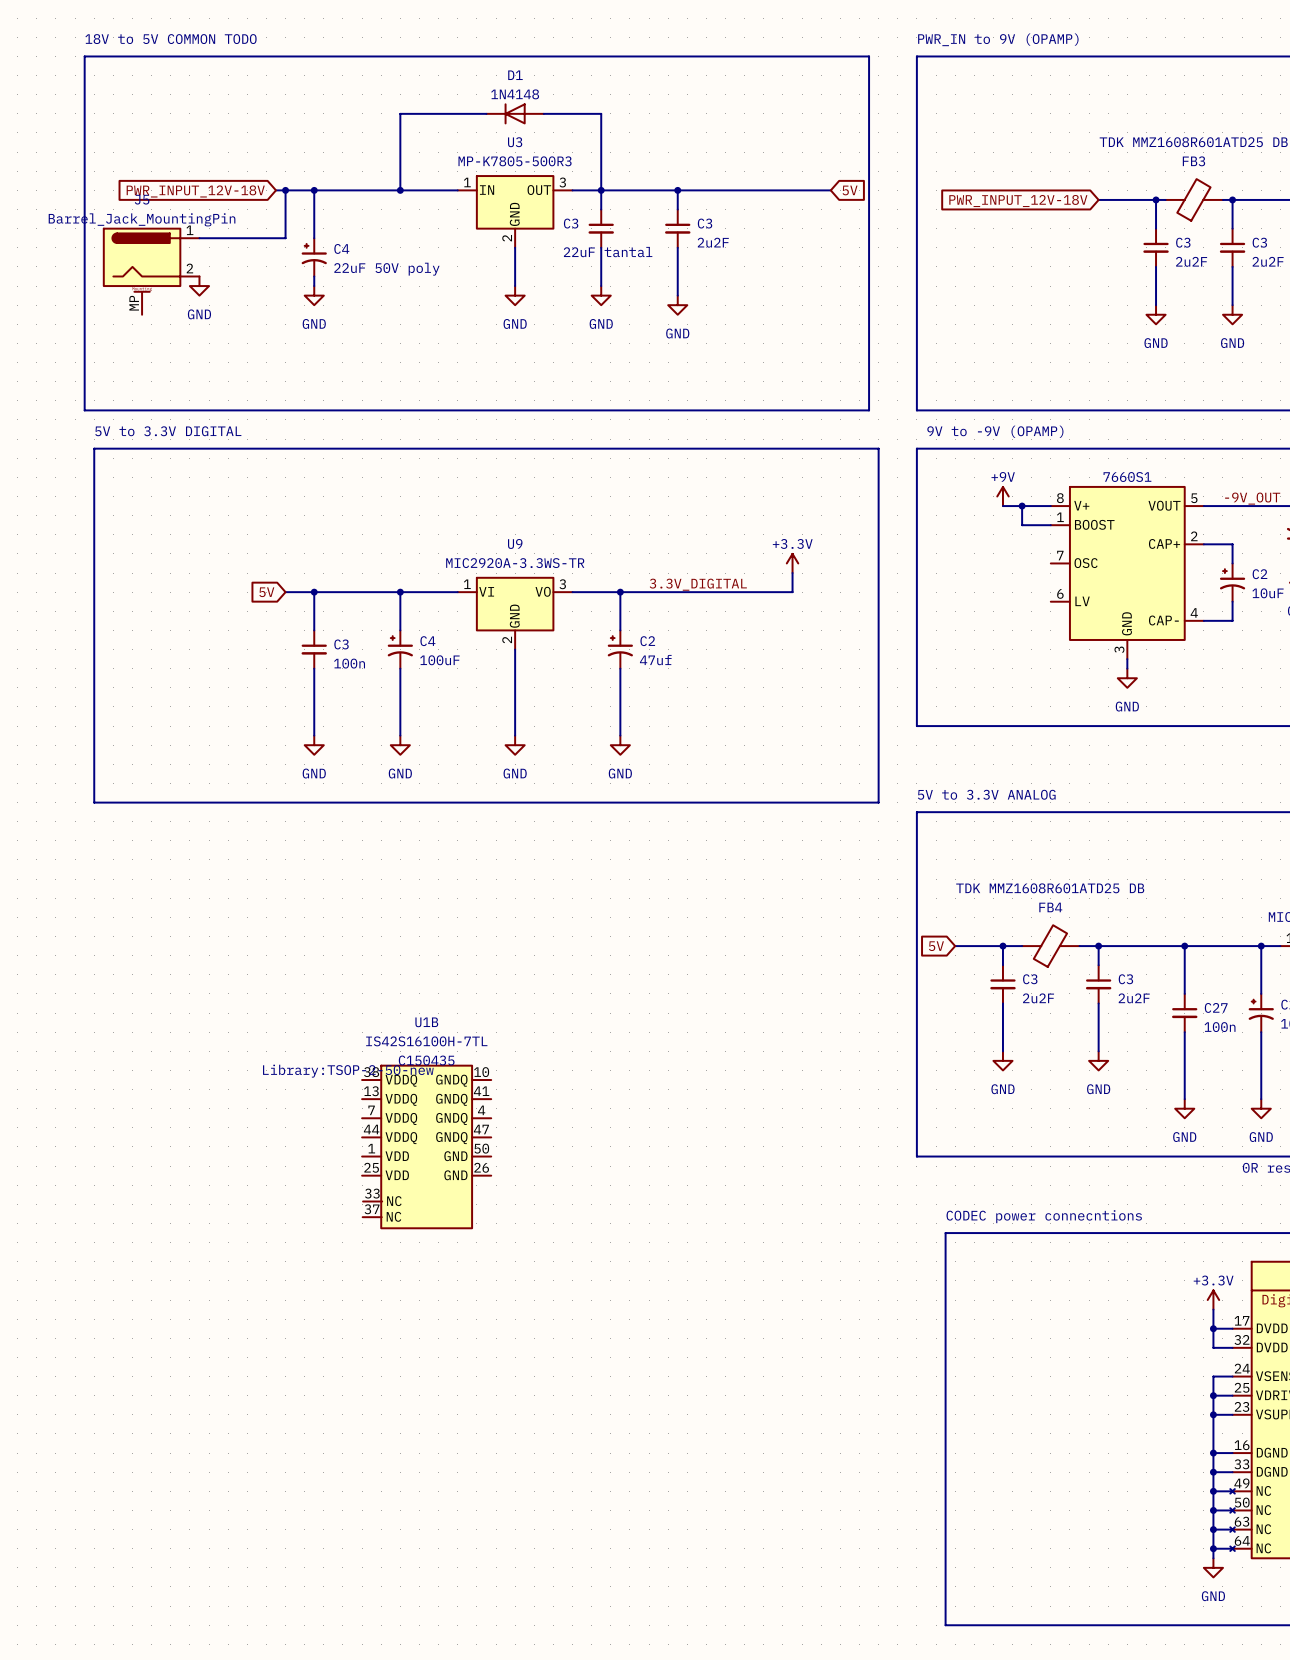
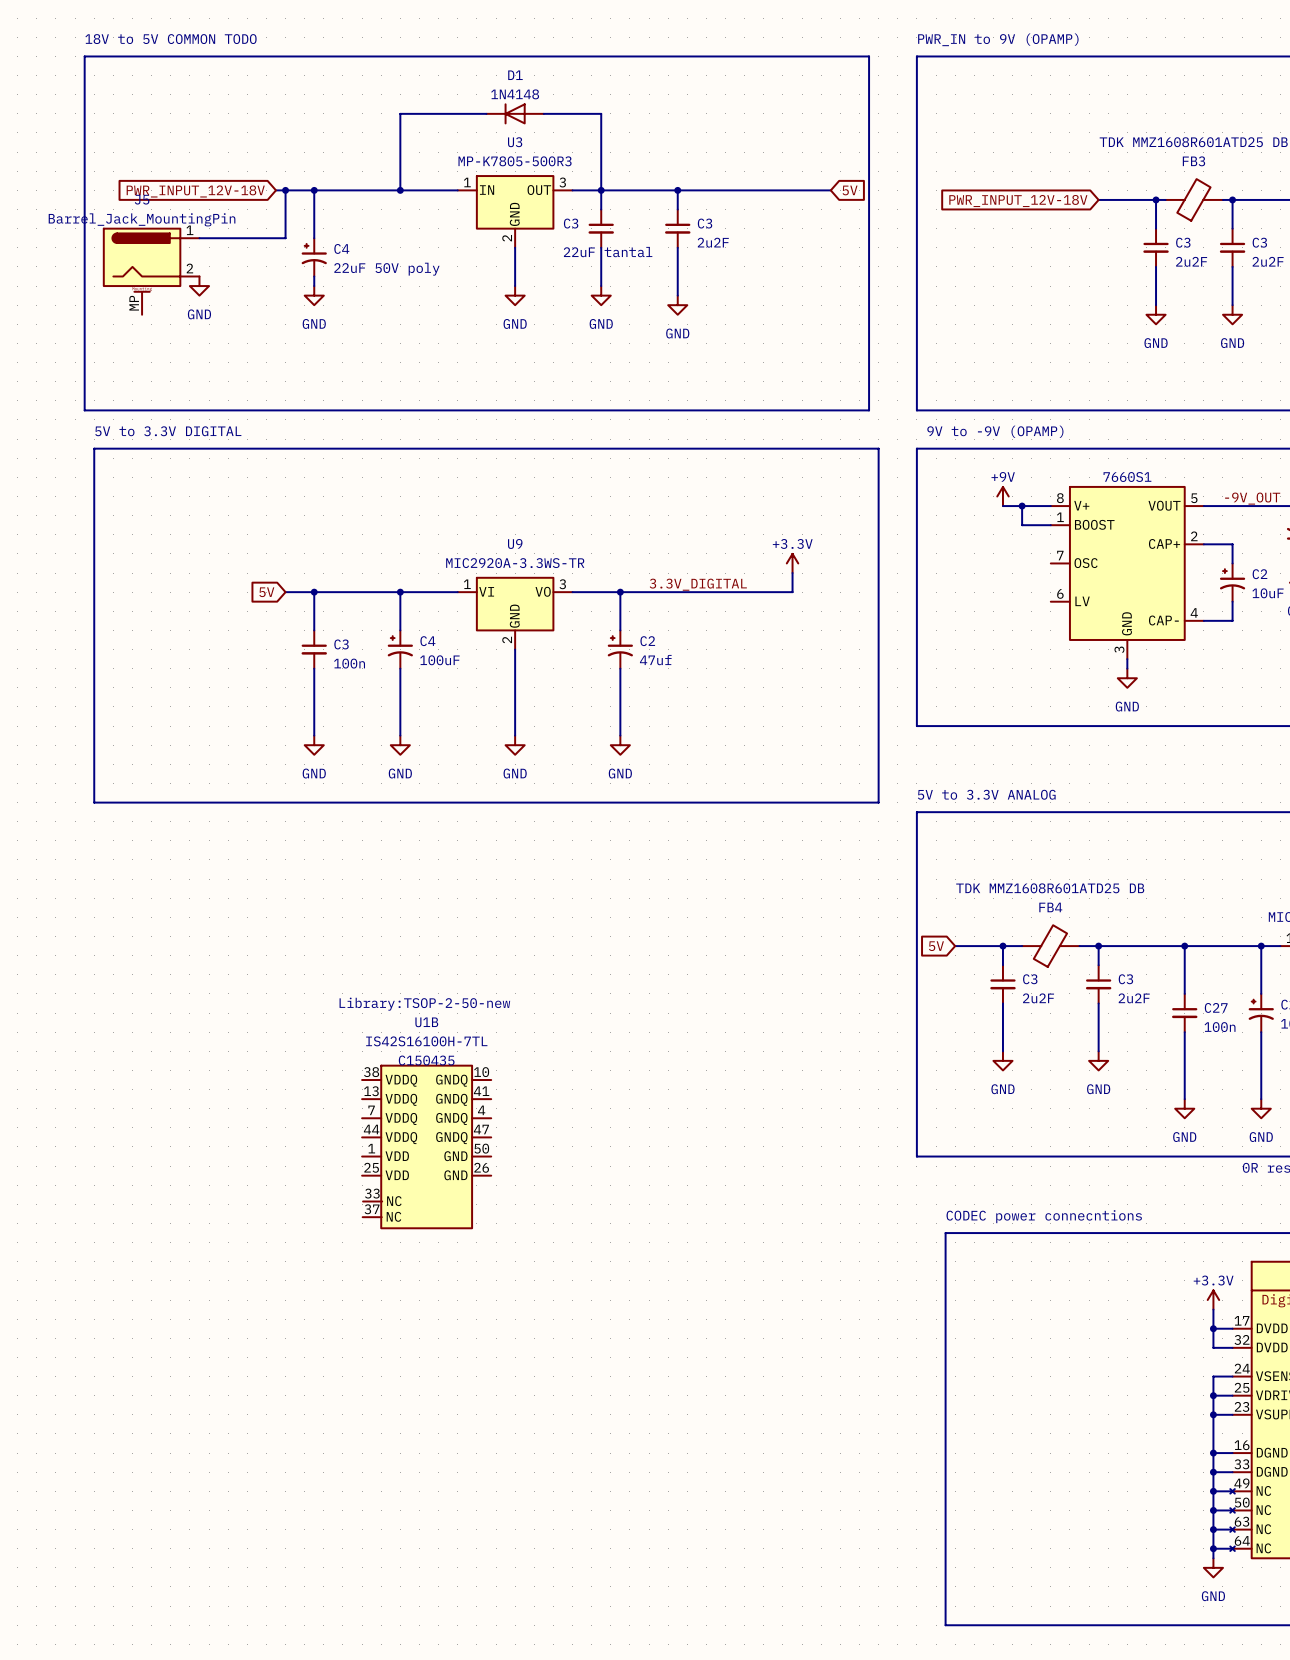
U1B text position: Library:TSOP-2-50-new (348, 1071) -> Library:TSOP-2-50-new (424, 1004)

